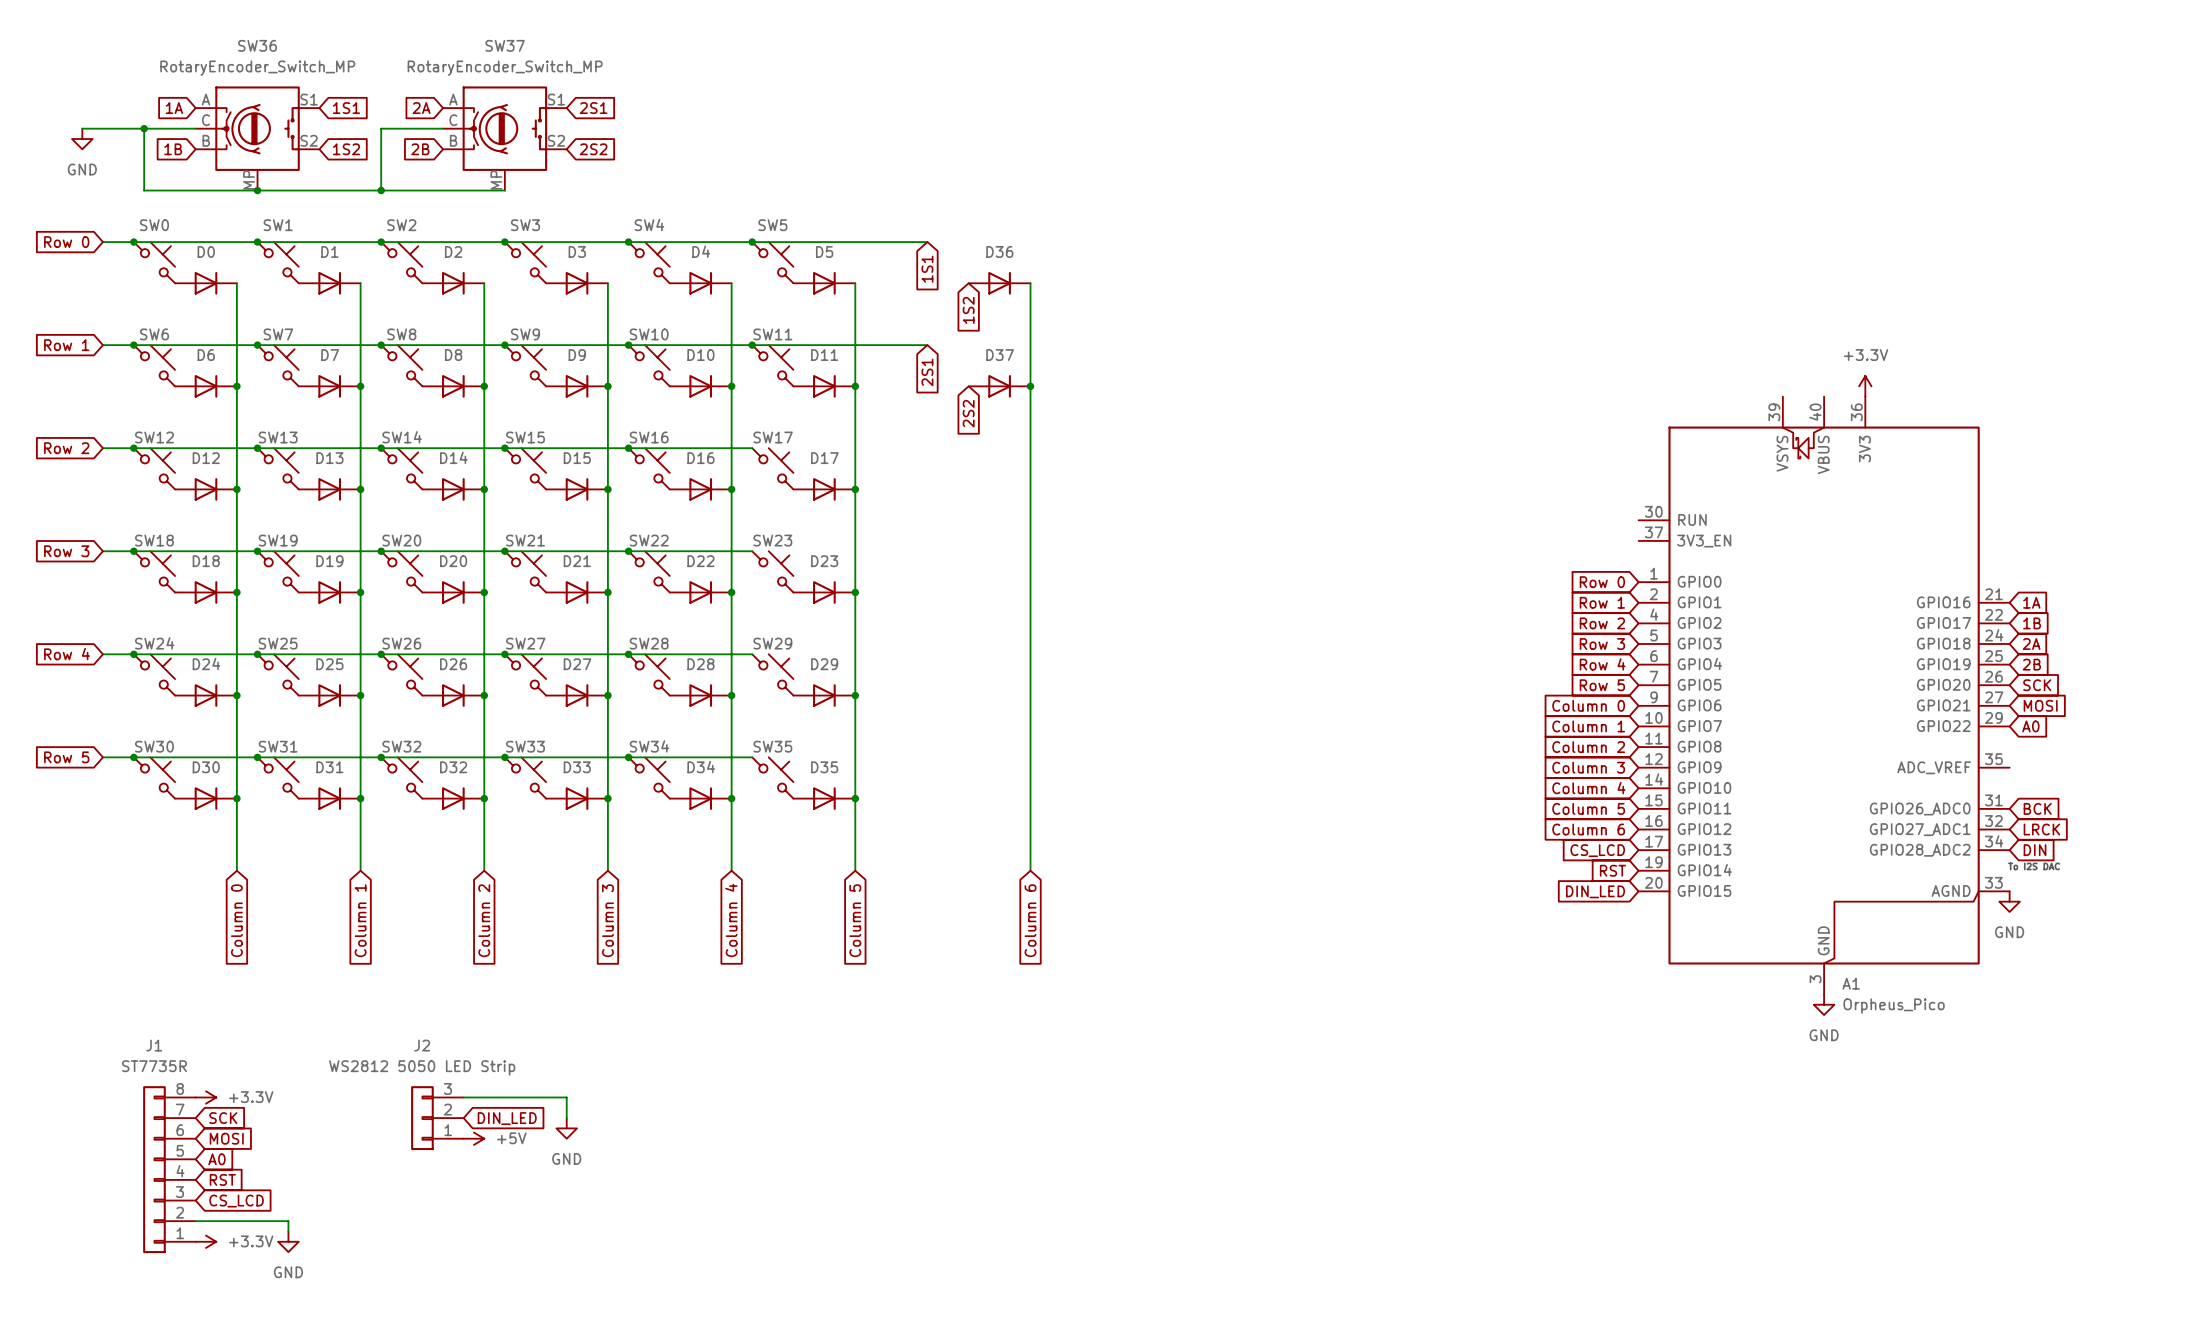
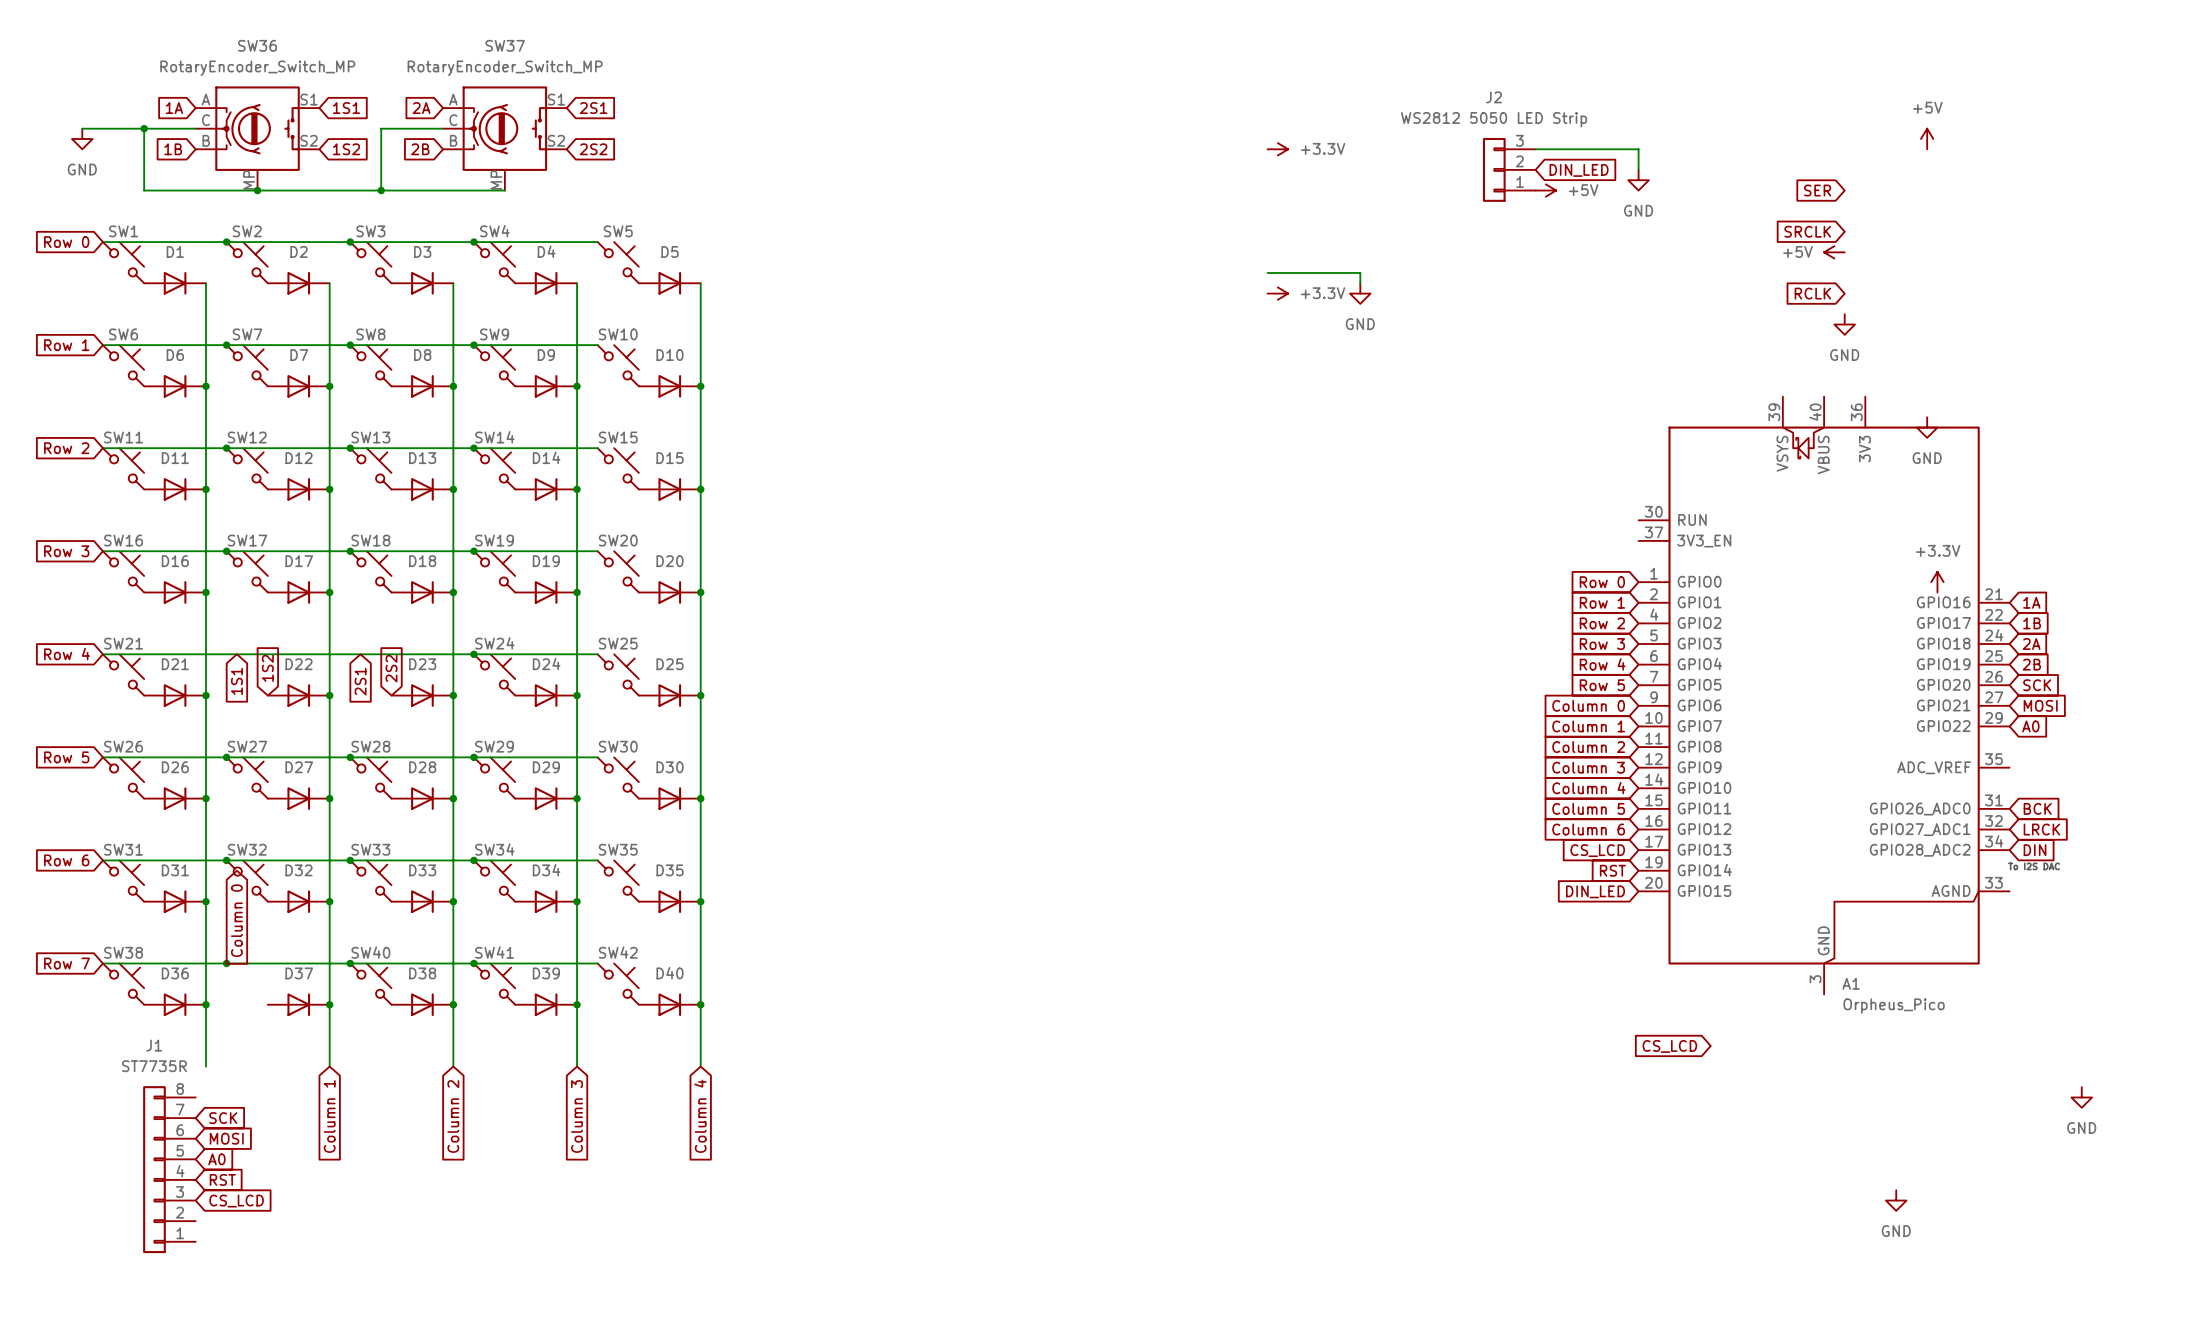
power symbol: none -> +5V (1927, 138)
power symbol: none -> +3.3V (1277, 149)
wire: none -> (1535, 149) (1638, 149) (1638, 169)
global label: none -> DIN_LED (1579, 170)
power symbol: none -> GND (1638, 180)
power symbol: none -> +5V (1545, 190)
global label: none -> SER (1817, 190)
SW4 name position: SW4 (649, 224) -> SW4 (494, 231)
SW1 name position: SW1 (278, 225) -> SW1 (123, 231)
SW2 name position: SW2 (401, 225) -> SW2 (247, 231)
SW3 name position: SW3 (525, 225) -> SW3 (370, 231)
SW5 name position: SW5 (772, 225) -> SW5 (618, 231)
global label: none -> SRCLK (1807, 231)
junction: (133, 242) -> none
junction position: (257, 242) -> (226, 242)
junction position: (381, 242) -> (350, 242)
junction position: (504, 242) -> (473, 242)
wire: (597, 242) (927, 242) -> none
junction: (628, 242) -> none
junction: (752, 242) -> none
power symbol: none -> +5V (1834, 252)
SW0: (154, 262) -> none
SW1 position: (278, 262) -> (123, 262)
SW2 position: (401, 262) -> (247, 262)
SW3 position: (525, 262) -> (370, 262)
SW4 position: (649, 262) -> (494, 262)
SW5 position: (772, 262) -> (618, 262)
global label: 1S1 (927, 269) -> none
wire: none -> (1267, 272) (1360, 272) (1360, 283)
wire: none -> (206, 283) (206, 1066)
D0: (206, 283) -> none
wire: (236, 283) (236, 870) -> none
wire: none -> (329, 283) (329, 1066)
D1 position: (329, 283) -> (175, 283)
wire: (360, 283) (360, 870) -> none
wire: none -> (453, 283) (453, 1066)
D2 position: (453, 283) -> (298, 283)
wire: (484, 283) (484, 870) -> none
wire: none -> (577, 283) (577, 1066)
D3 position: (577, 283) -> (422, 283)
wire: (607, 283) (607, 870) -> none
wire: none -> (700, 283) (700, 1066)
D4 position: (700, 283) -> (546, 283)
wire: (731, 283) (731, 870) -> none
D5 position: (824, 283) -> (669, 283)
wire: (855, 283) (855, 870) -> none
D36 position: (999, 283) -> (175, 1004)
wire: (1030, 283) (1030, 870) -> none
power symbol: none -> +3.3V (1277, 293)
power symbol: none -> GND (1360, 293)
global label: none -> RCLK (1812, 293)
global label: 1S2 (968, 310) -> none
power symbol: none -> GND (1844, 324)
junction: (133, 345) -> none
junction: none -> (226, 345)
junction: (257, 345) -> none
junction: none -> (350, 345)
junction: (381, 345) -> none
junction: none -> (473, 345)
junction: (504, 345) -> none
wire: (597, 345) (927, 345) -> none
junction: (628, 345) -> none
junction: (752, 345) -> none
SW6 position: (154, 365) -> (123, 365)
SW7 position: (278, 365) -> (247, 365)
SW8 position: (401, 365) -> (370, 365)
SW9 position: (525, 365) -> (494, 365)
SW10 position: (649, 365) -> (618, 365)
SW11 position: (772, 365) -> (123, 468)
global label: 2S1 (927, 372) -> none
junction: none -> (206, 386)
D6 position: (206, 386) -> (175, 386)
junction: (236, 386) -> none
junction: none -> (329, 386)
D7 position: (329, 386) -> (298, 386)
junction: (360, 386) -> none
junction: none -> (453, 386)
D8 position: (453, 386) -> (422, 386)
junction: (484, 386) -> none
D9 position: (577, 386) -> (546, 386)
junction position: (607, 386) -> (577, 386)
D10 position: (700, 386) -> (669, 386)
junction position: (731, 386) -> (700, 386)
D11 position: (824, 386) -> (175, 489)
junction: (855, 386) -> none
D37 position: (999, 386) -> (298, 1004)
junction: (1030, 386) -> none
power symbol: +3.3V (1865, 386) -> none
global label: 2S2 (968, 413) -> none
power symbol: none -> GND (1927, 427)
junction: (133, 448) -> none
junction: none -> (226, 448)
junction: (257, 448) -> none
junction: none -> (350, 448)
junction: (381, 448) -> none
junction: none -> (473, 448)
junction: (504, 448) -> none
wire: (597, 448) (752, 448) -> none
junction: (628, 448) -> none
SW12 position: (154, 468) -> (247, 468)
SW13 position: (278, 468) -> (370, 468)
SW14 position: (401, 468) -> (494, 468)
SW15 position: (525, 468) -> (618, 468)
SW16 position: (649, 468) -> (123, 571)
SW17 position: (772, 468) -> (247, 571)
junction: none -> (206, 489)
D12 position: (206, 489) -> (298, 489)
junction: (236, 489) -> none
junction: none -> (329, 489)
D13 position: (329, 489) -> (422, 489)
junction: (360, 489) -> none
junction: none -> (453, 489)
D14 position: (453, 489) -> (546, 489)
junction: (484, 489) -> none
D15 position: (577, 489) -> (669, 489)
junction position: (607, 489) -> (577, 489)
D16 position: (700, 489) -> (175, 592)
junction position: (731, 489) -> (700, 489)
D17 position: (824, 489) -> (298, 592)
junction: (855, 489) -> none
junction: (133, 551) -> none
junction: none -> (226, 551)
junction: (257, 551) -> none
junction: none -> (350, 551)
junction: (381, 551) -> none
junction: none -> (473, 551)
junction: (504, 551) -> none
wire: (597, 551) (752, 551) -> none
junction: (628, 551) -> none
SW18 position: (154, 571) -> (370, 571)
SW19 position: (278, 571) -> (494, 571)
SW20 position: (401, 571) -> (618, 571)
SW21 position: (525, 571) -> (123, 674)
SW22: (649, 571) -> none
SW23: (772, 571) -> none
power symbol: none -> +3.3V (1937, 582)
junction: none -> (206, 592)
D18 position: (206, 592) -> (422, 592)
junction: (236, 592) -> none
junction: none -> (329, 592)
D19 position: (329, 592) -> (546, 592)
junction: (360, 592) -> none
junction: none -> (453, 592)
D20 position: (453, 592) -> (669, 592)
junction: (484, 592) -> none
D21 position: (577, 592) -> (175, 695)
junction position: (607, 592) -> (577, 592)
D22 position: (700, 592) -> (298, 695)
junction position: (731, 592) -> (700, 592)
D23 position: (824, 592) -> (422, 695)
junction: (855, 592) -> none
junction: (133, 654) -> none
junction: (257, 654) -> none
junction: (381, 654) -> none
junction: none -> (473, 654)
junction: (504, 654) -> none
wire: (597, 654) (752, 654) -> none
junction: (628, 654) -> none
global label: none -> 1S2 (267, 668)
global label: none -> 2S2 (391, 668)
SW24 position: (154, 674) -> (494, 674)
SW25 position: (278, 674) -> (618, 674)
SW26 position: (401, 674) -> (123, 777)
SW27 position: (525, 674) -> (247, 777)
SW28 position: (649, 674) -> (370, 777)
SW29 position: (772, 674) -> (494, 777)
global label: none -> 1S1 (236, 681)
global label: none -> 2S1 (360, 681)
D24 position: (206, 695) -> (546, 695)
junction position: (236, 695) -> (206, 695)
D25 position: (329, 695) -> (669, 695)
junction position: (360, 695) -> (329, 695)
junction: none -> (453, 695)
D26 position: (453, 695) -> (175, 798)
junction: (484, 695) -> none
D27 position: (577, 695) -> (298, 798)
junction position: (607, 695) -> (577, 695)
D28 position: (700, 695) -> (422, 798)
junction position: (731, 695) -> (700, 695)
D29 position: (824, 695) -> (546, 798)
junction: (855, 695) -> none
junction: (133, 757) -> none
junction: none -> (226, 757)
junction: (257, 757) -> none
junction: none -> (350, 757)
junction: (381, 757) -> none
junction: none -> (473, 757)
junction: (504, 757) -> none
wire: (597, 757) (752, 757) -> none
junction: (628, 757) -> none
SW30 position: (154, 777) -> (618, 777)
SW31 position: (278, 777) -> (123, 881)
SW32 position: (401, 777) -> (247, 881)
SW33 position: (525, 777) -> (370, 881)
SW34 position: (649, 777) -> (494, 881)
SW35 position: (772, 777) -> (618, 881)
junction: none -> (206, 798)
D30 position: (206, 798) -> (669, 798)
junction: (236, 798) -> none
junction: none -> (329, 798)
D31 position: (329, 798) -> (175, 901)
junction: (360, 798) -> none
junction: none -> (453, 798)
D32 position: (453, 798) -> (298, 901)
junction: (484, 798) -> none
D33 position: (577, 798) -> (422, 901)
junction position: (607, 798) -> (577, 798)
D34 position: (700, 798) -> (546, 901)
junction position: (731, 798) -> (700, 798)
D35 position: (824, 798) -> (669, 901)
junction: (855, 798) -> none
global label: none -> Row 6 (66, 860)
wire: none -> (102, 860) (597, 860)
junction: none -> (226, 860)
junction: none -> (350, 860)
junction: none -> (473, 860)
junction: none -> (206, 901)
junction: none -> (329, 901)
junction: none -> (453, 901)
junction: none -> (577, 901)
junction: none -> (700, 901)
power symbol: GND (2009, 901) -> none
global label position: Column 1 (360, 920) -> Column 1 (329, 1116)
global label position: Column 2 (484, 920) -> Column 2 (453, 1116)
global label position: Column 3 (607, 920) -> Column 3 (577, 1116)
global label position: Column 4 (731, 920) -> Column 4 (700, 1116)
global label: Column 5 (855, 920) -> none
global label: Column 6 (1030, 920) -> none
global label: none -> Row 7 (66, 963)
wire: none -> (102, 963) (597, 963)
junction: none -> (226, 963)
junction: none -> (350, 963)
junction: none -> (473, 963)
SW38: none -> (123, 984)
SW40: none -> (370, 984)
SW41: none -> (494, 984)
SW42: none -> (618, 984)
junction: none -> (206, 1004)
junction: none -> (329, 1004)
D38: none -> (422, 1004)
junction: none -> (453, 1004)
D39: none -> (546, 1004)
junction: none -> (577, 1004)
D40: none -> (669, 1004)
junction: none -> (700, 1004)
power symbol: GND (1824, 1004) -> none
global label: none -> CS_LCD (1669, 1046)
power symbol: +3.3V (206, 1097) -> none
wire: (463, 1097) (566, 1097) (566, 1118) -> none
power symbol: none -> GND (2081, 1097)
J2 position: (437, 1118) -> (1509, 169)
global label: DIN_LED (507, 1118) -> none
power symbol: GND (566, 1128) -> none
power symbol: +5V (473, 1138) -> none
power symbol: none -> GND (1896, 1200)
wire: (195, 1221) (288, 1221) (288, 1231) -> none
power symbol: +3.3V (206, 1241) -> none
power symbol: GND (288, 1241) -> none

